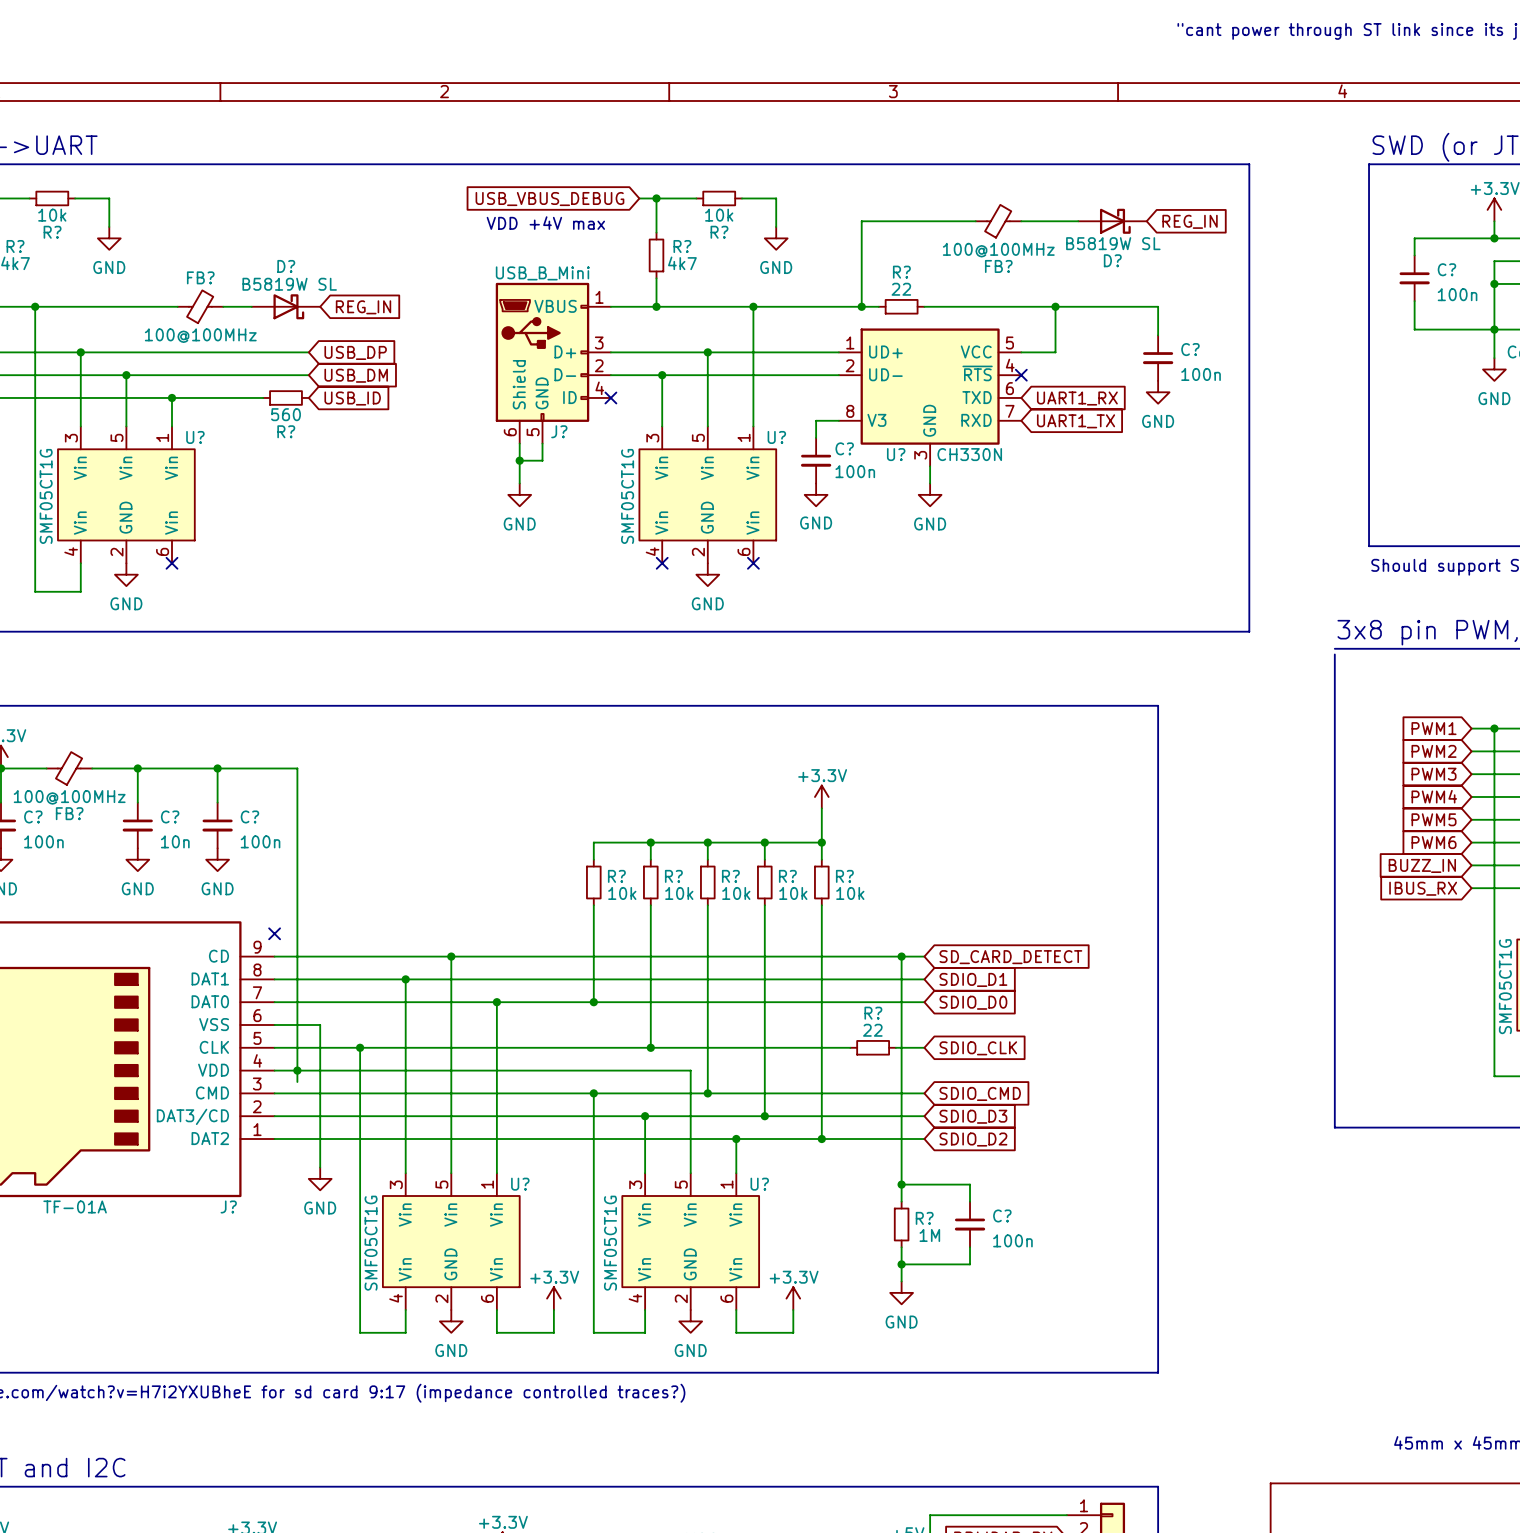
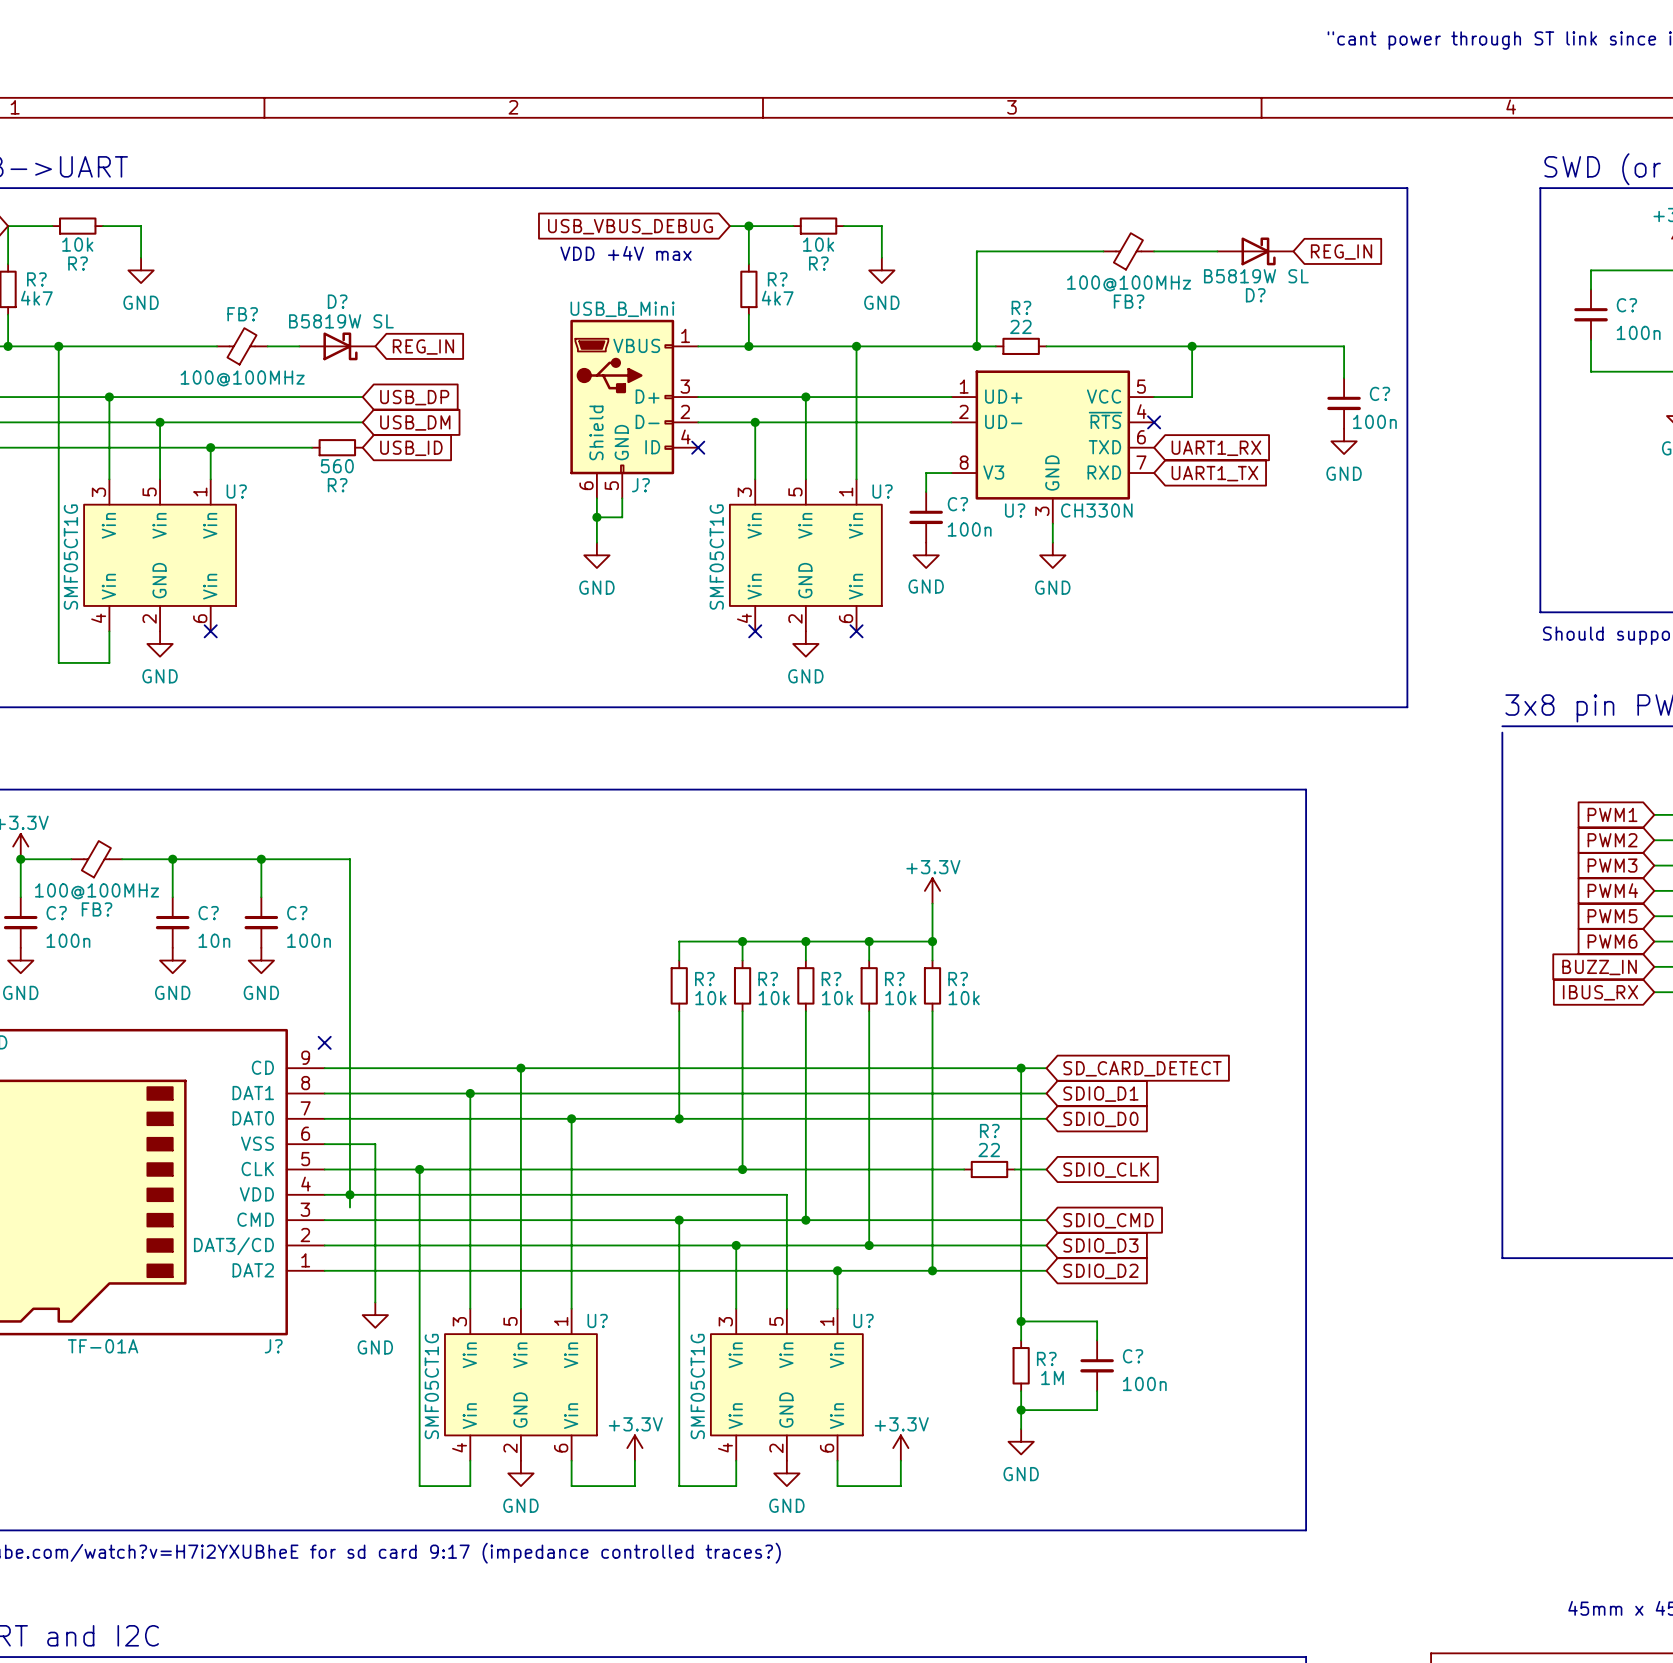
wire: (1158, 306) (1158, 335) -> (1306, 346) (1344, 346) (1344, 378)
C? position: (1158, 358) -> (1344, 403)
C? value position: 100n (1201, 374) -> 100n (1374, 421)
power symbol position: GND (1158, 392) -> GND (1344, 441)

